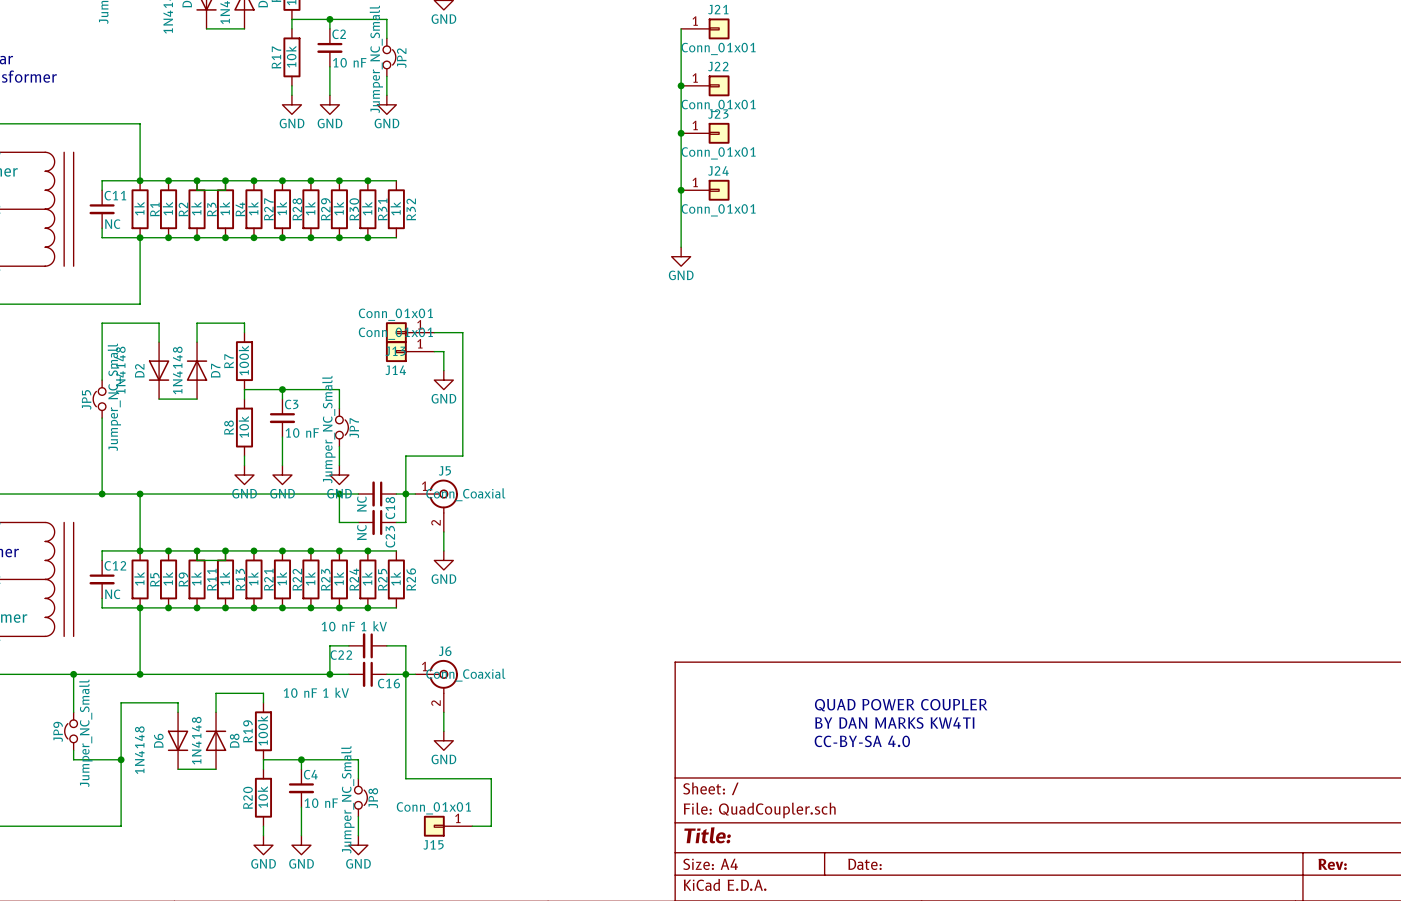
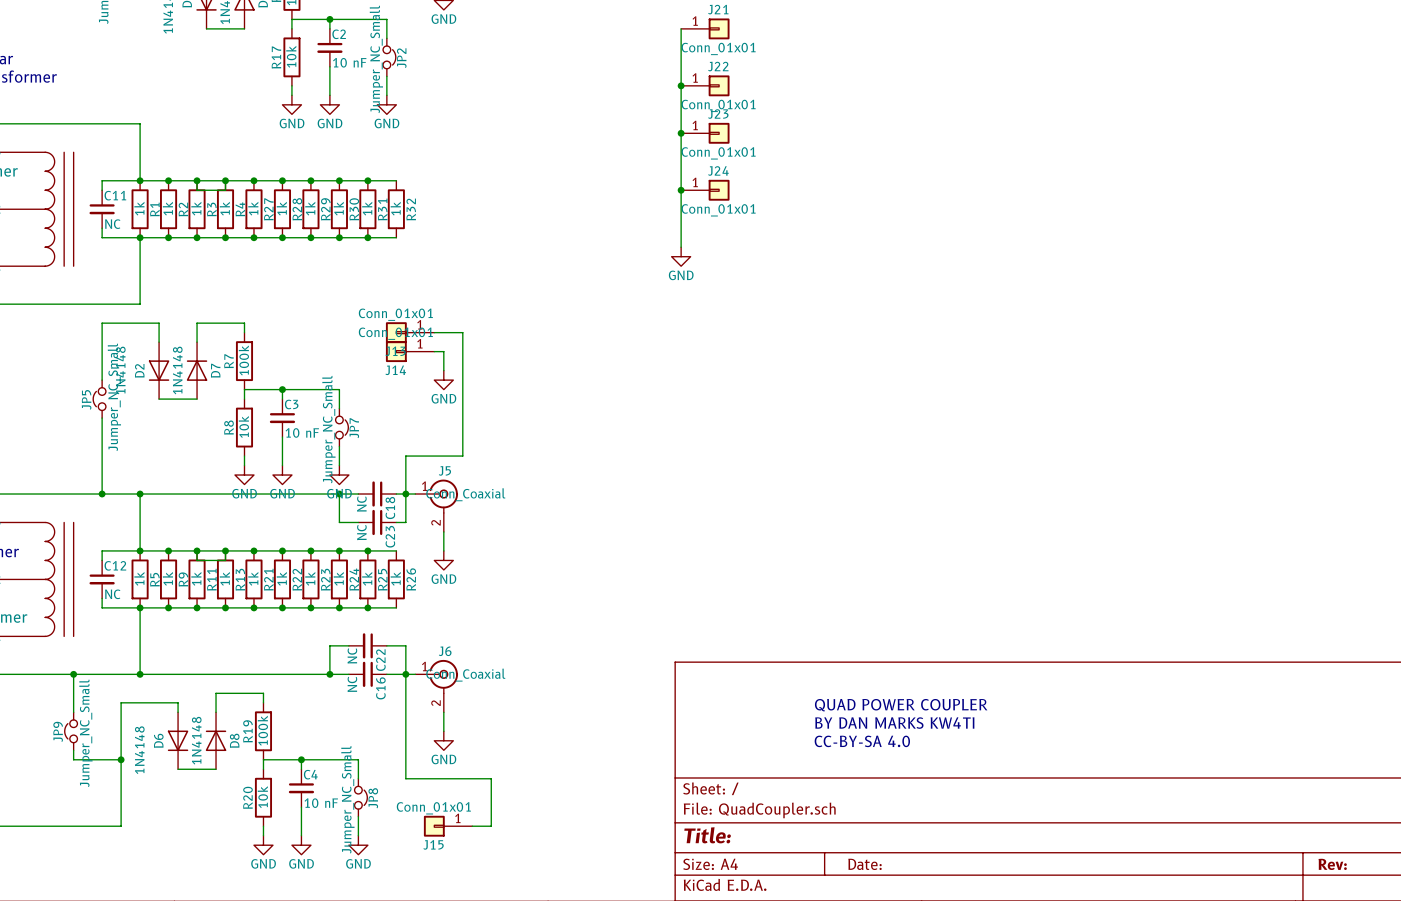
C22 value: 10 nF 1 kV (354, 626) -> NC (352, 655)
C22 name rotation: 0° (341, 655) -> 90° counterclockwise (380, 660)
C22 name position: C22 (341, 655) -> C22 (380, 660)
C16 name rotation: 0° (388, 683) -> 90° counterclockwise (380, 688)
C16 value: 10 nF 1 kV (316, 692) -> NC (352, 684)

